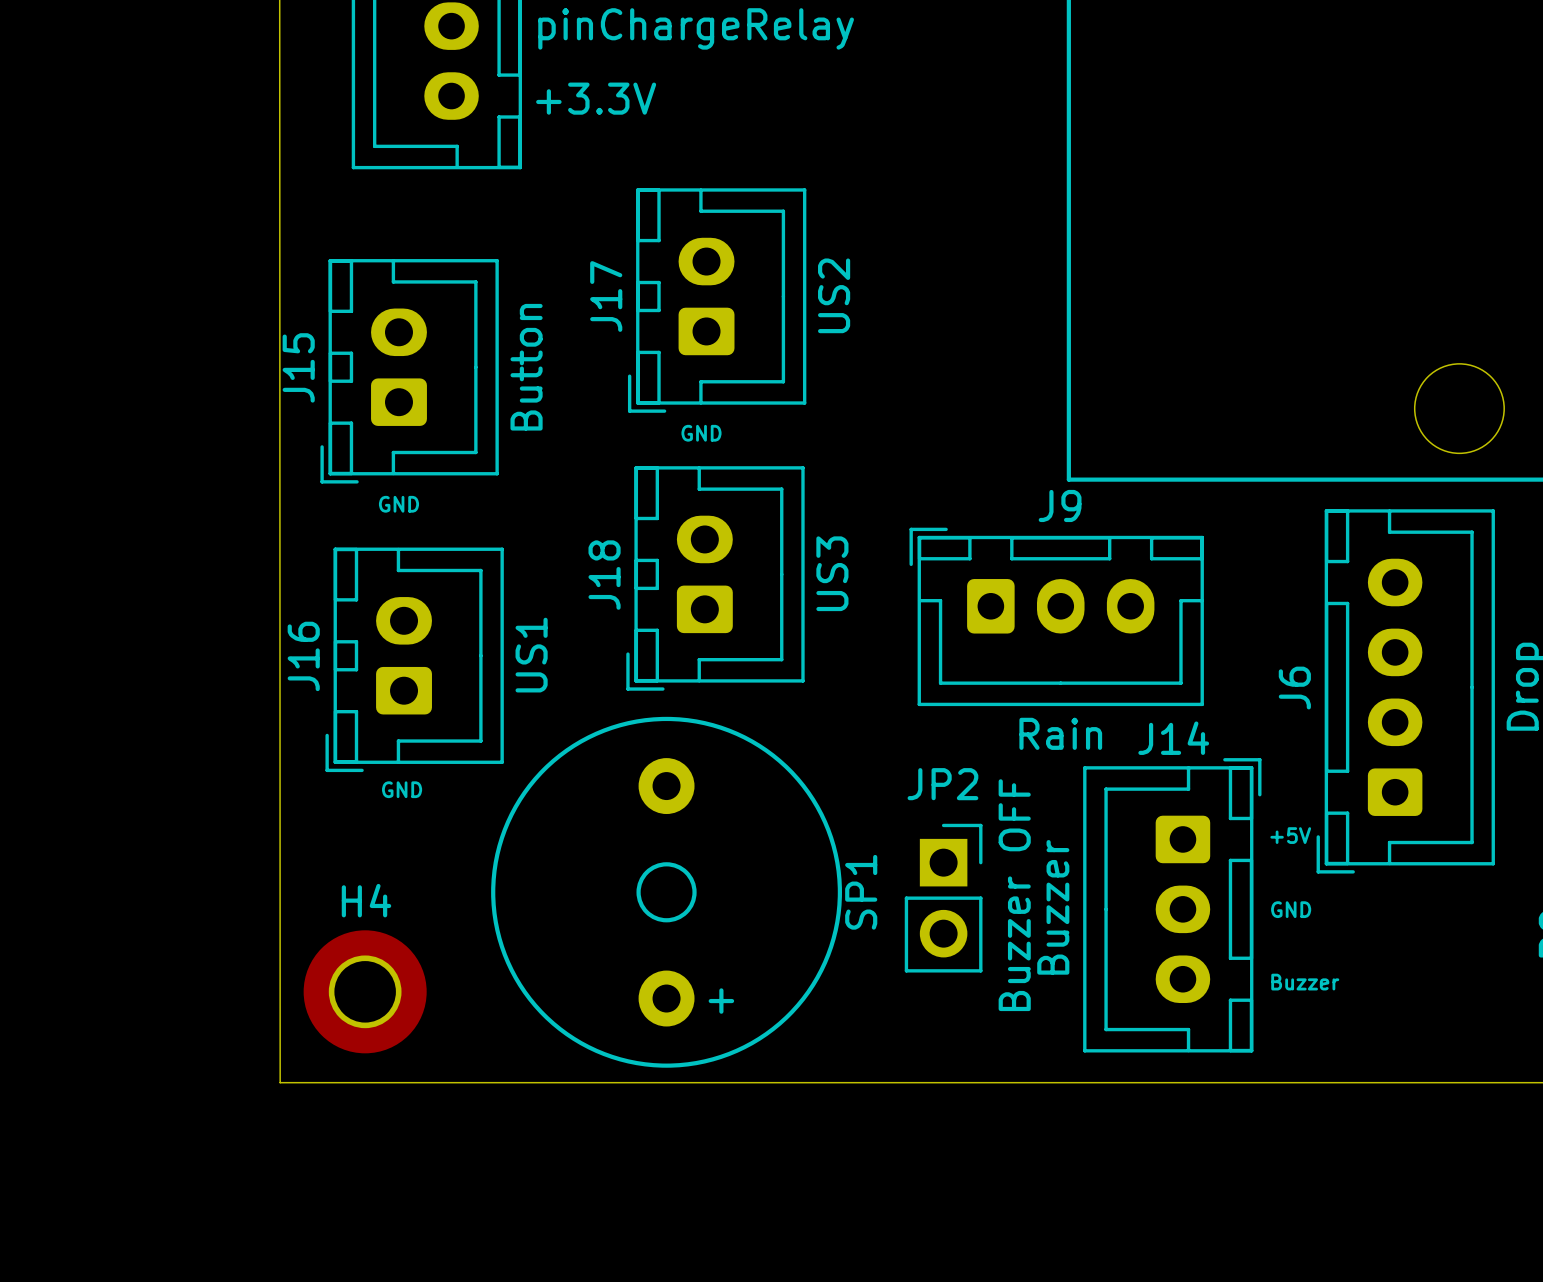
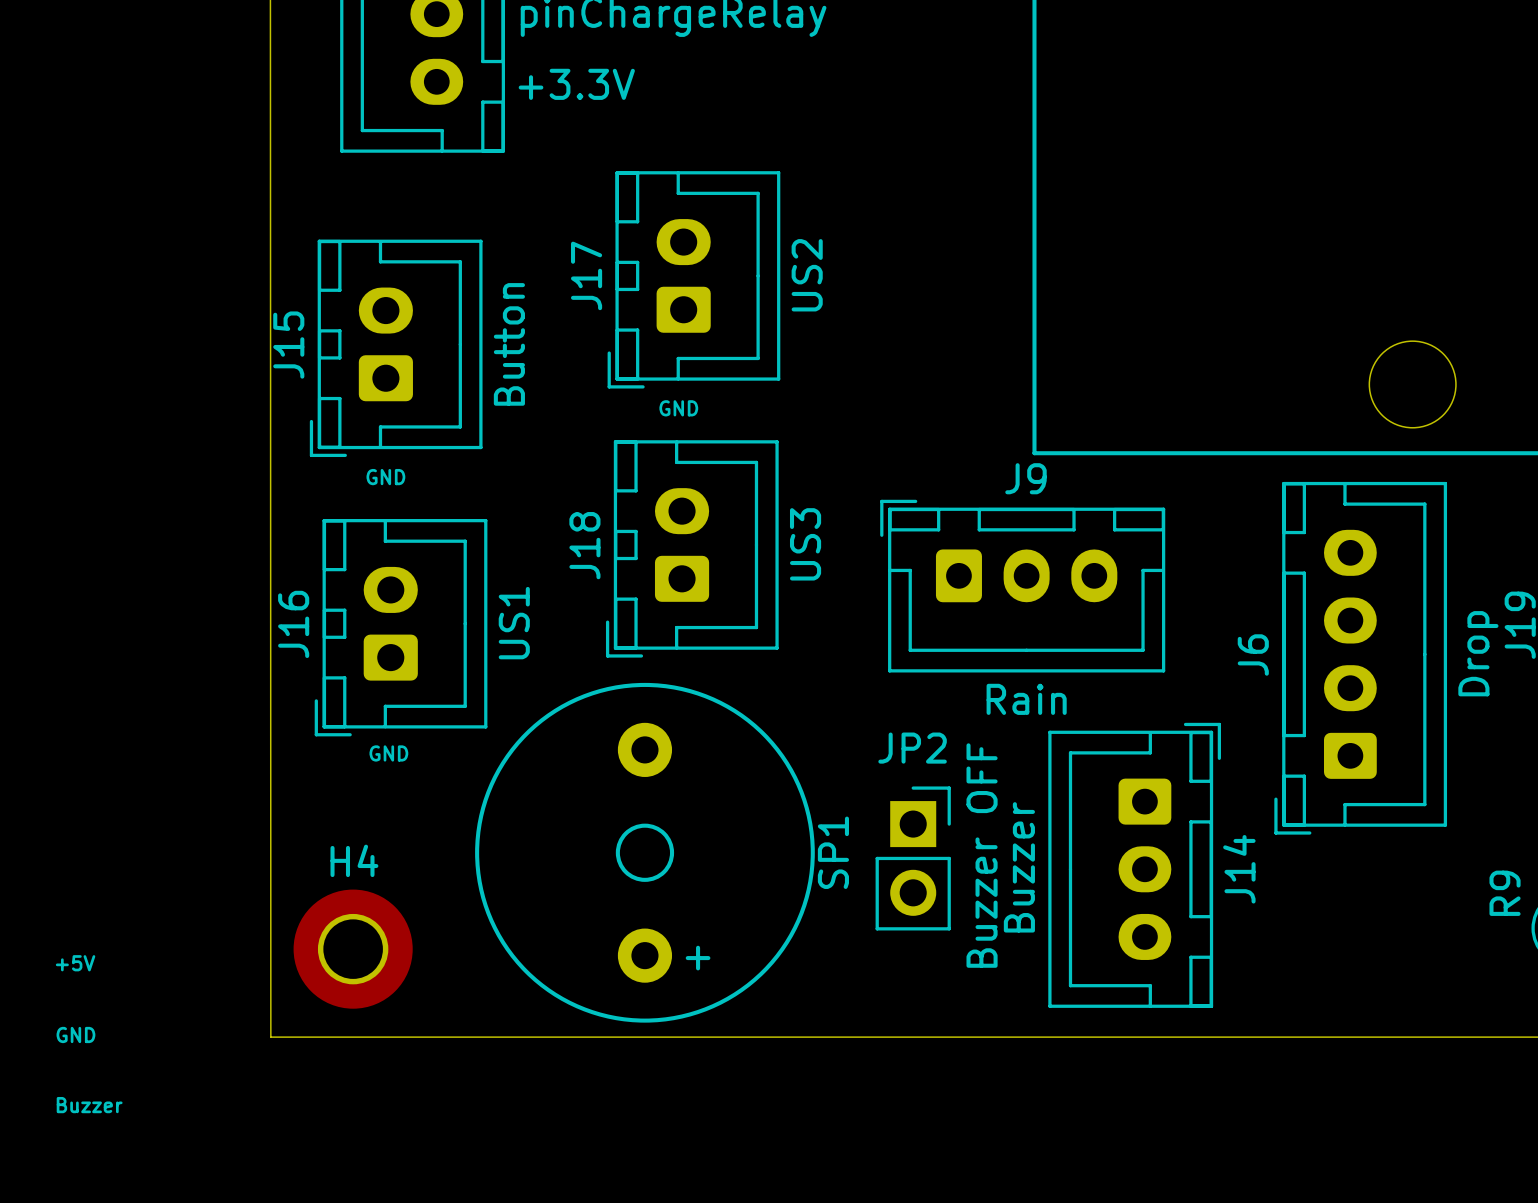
J14 name rotation: 0° (1173, 738) -> 90° counterclockwise (1239, 869)
J14 name position: J14 (1173, 738) -> J14 (1239, 869)
text: +5V (1290, 835) -> none
text: GND (1291, 909) -> none
text: Buzzer (1305, 982) -> none
text: none -> +5V (75, 963)
text: none -> GND (75, 1034)
text: none -> Buzzer (89, 1105)

